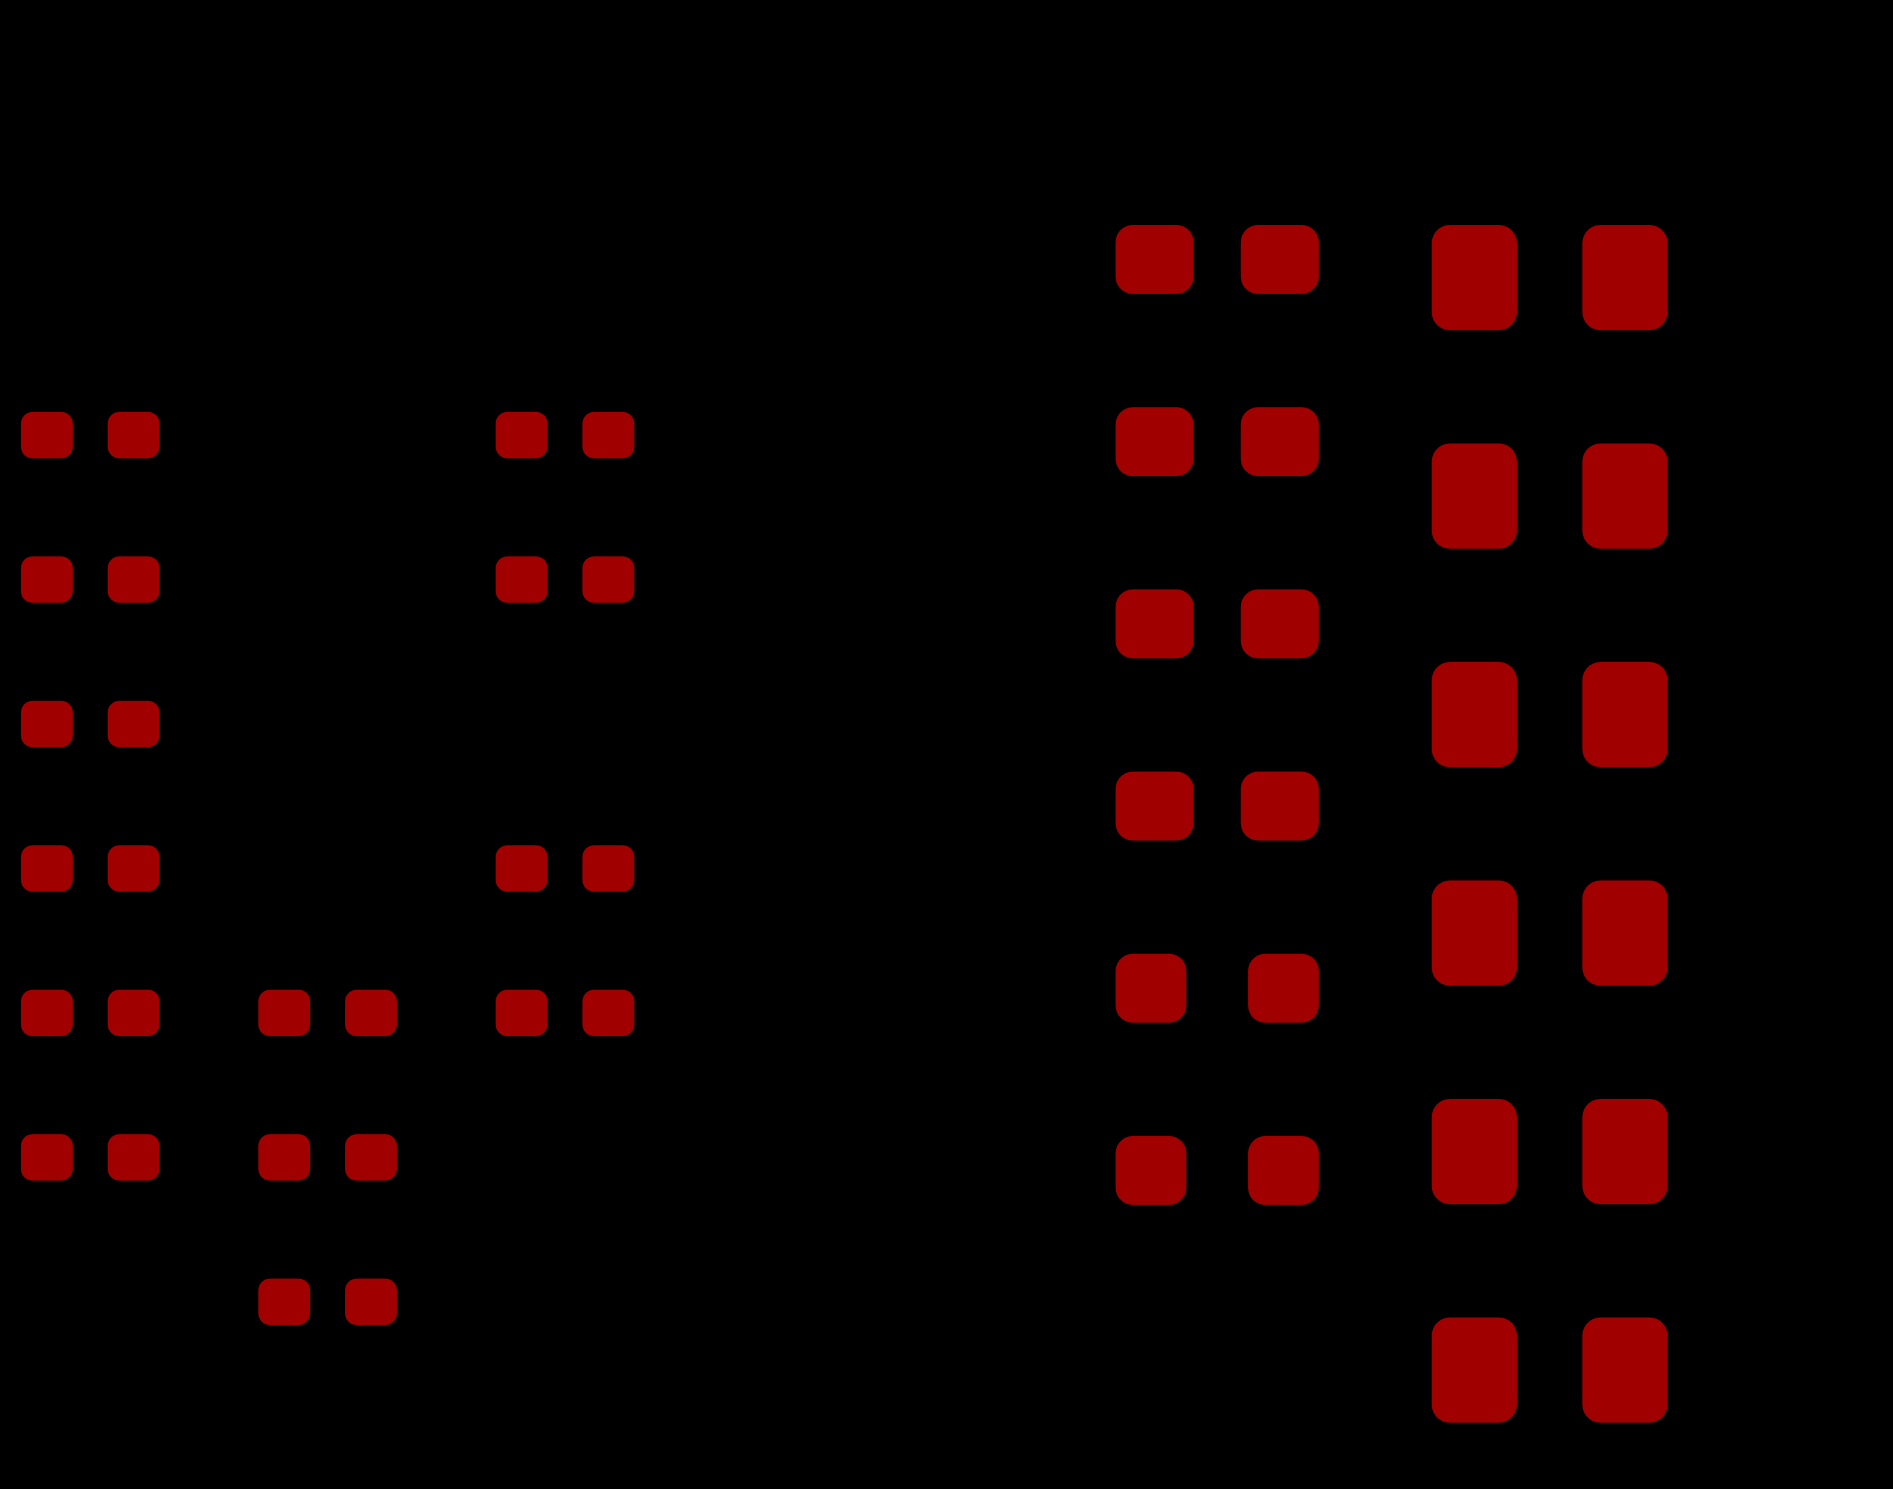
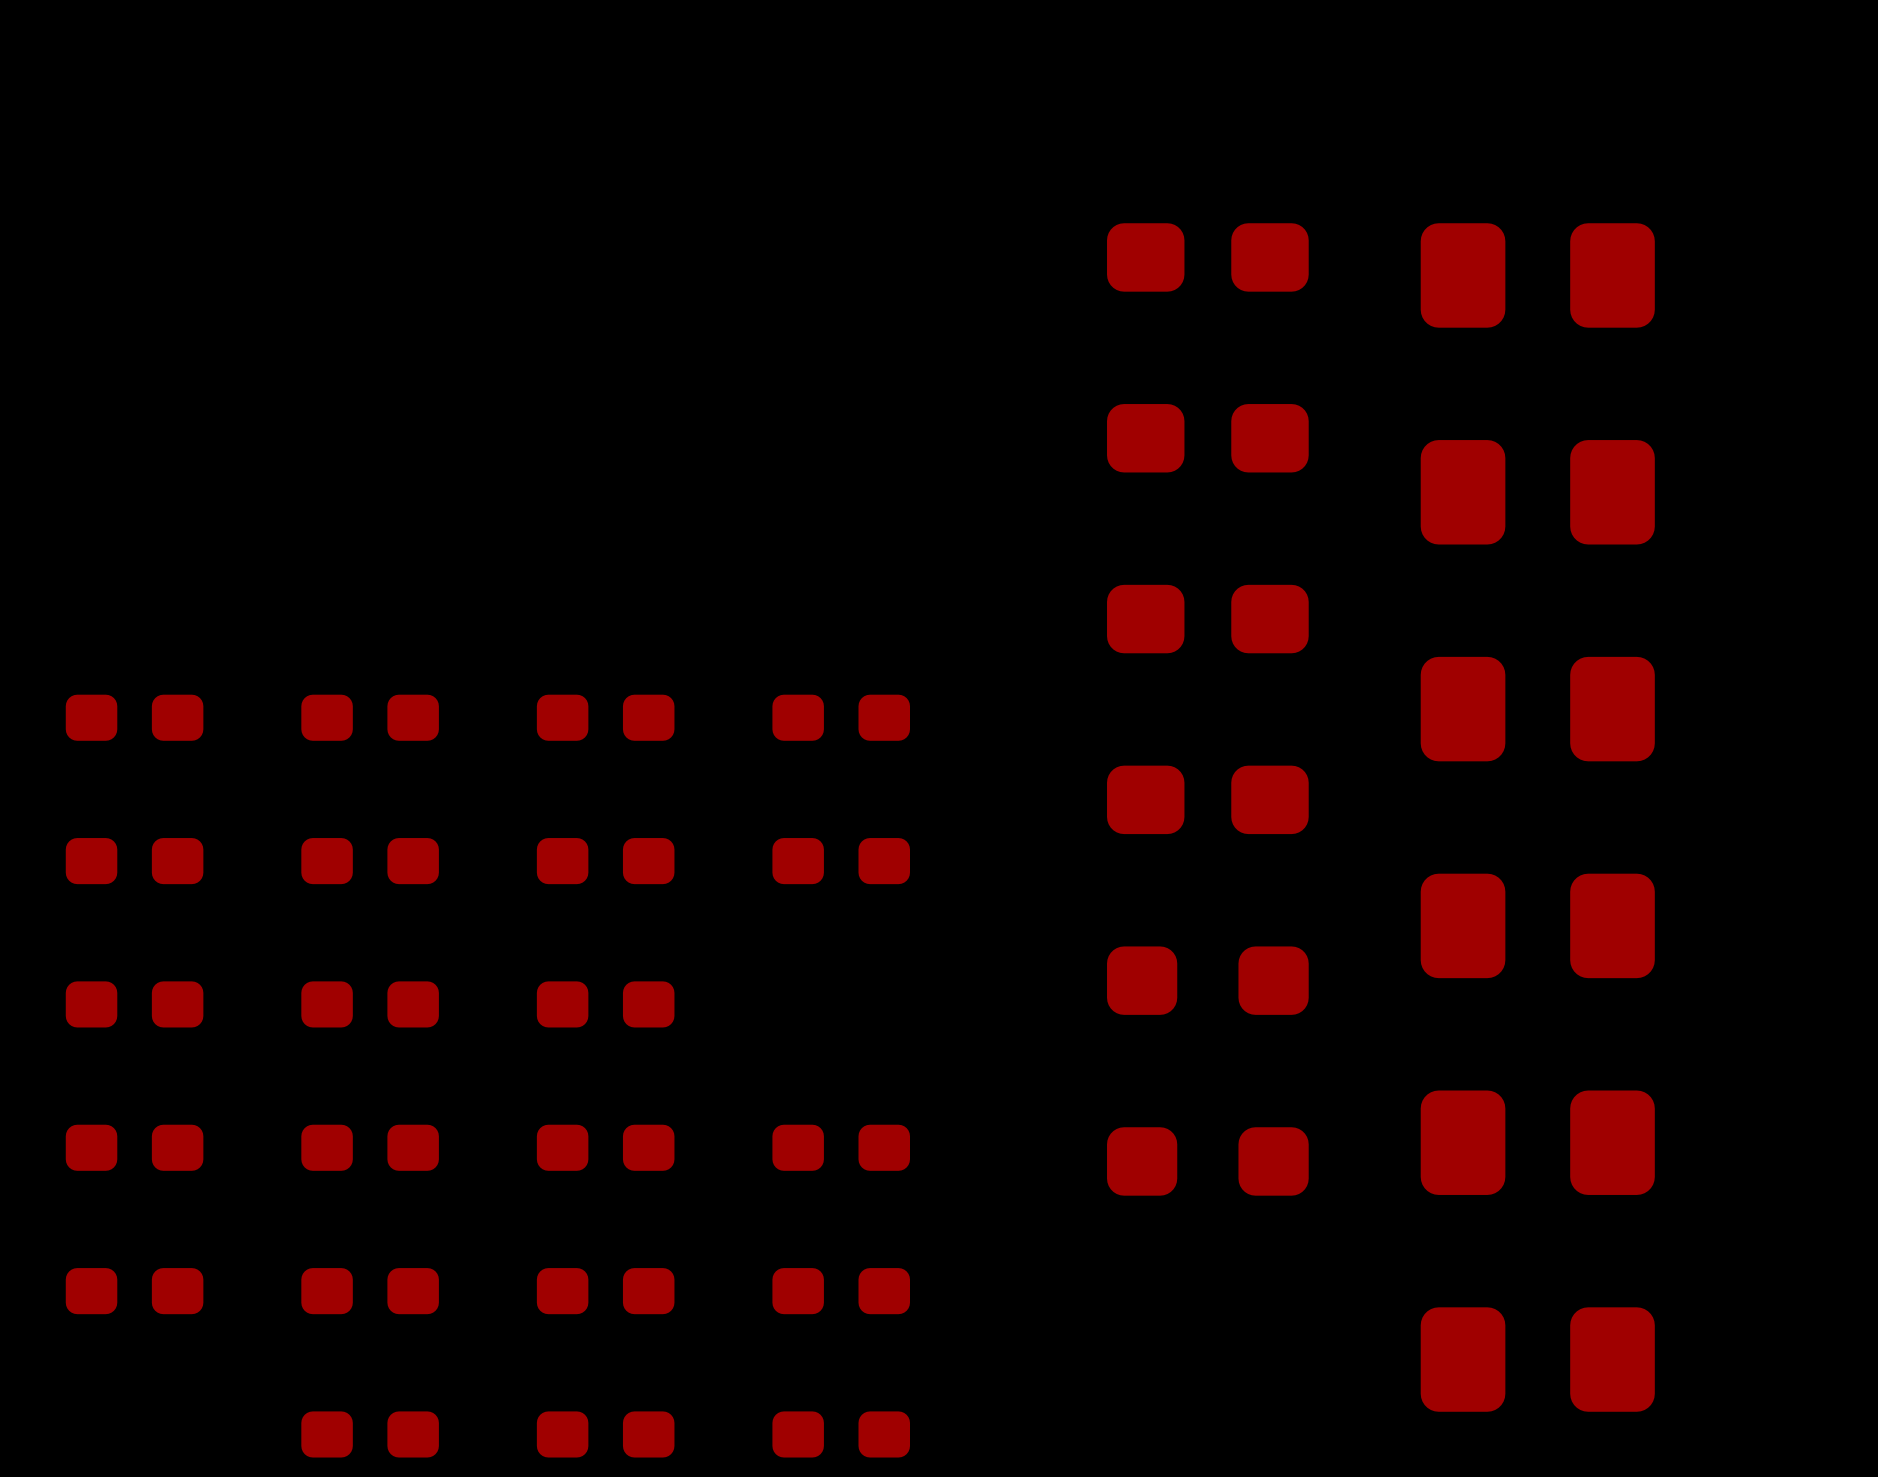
part: (90, 435) -> none
part: (564, 435) -> none
part: (90, 579) -> none
part: (564, 579) -> none
part: none -> (370, 717)
part: none -> (605, 717)
part: none -> (841, 717)
part position: (90, 724) -> (134, 717)
part: none -> (370, 861)
part: none -> (841, 861)
part position: (90, 868) -> (134, 861)
part position: (564, 868) -> (605, 861)
part position: (90, 1012) -> (134, 1004)
part position: (327, 1012) -> (370, 1004)
part position: (564, 1012) -> (605, 1004)
part: none -> (605, 1147)
part: none -> (841, 1147)
part position: (90, 1157) -> (134, 1147)
part position: (327, 1157) -> (370, 1147)
part: none -> (134, 1291)
part position: (327, 1301) -> (370, 1291)
part: none -> (605, 1291)
part: none -> (841, 1291)
part: none -> (370, 1434)
part: none -> (605, 1434)
part: none -> (841, 1434)

